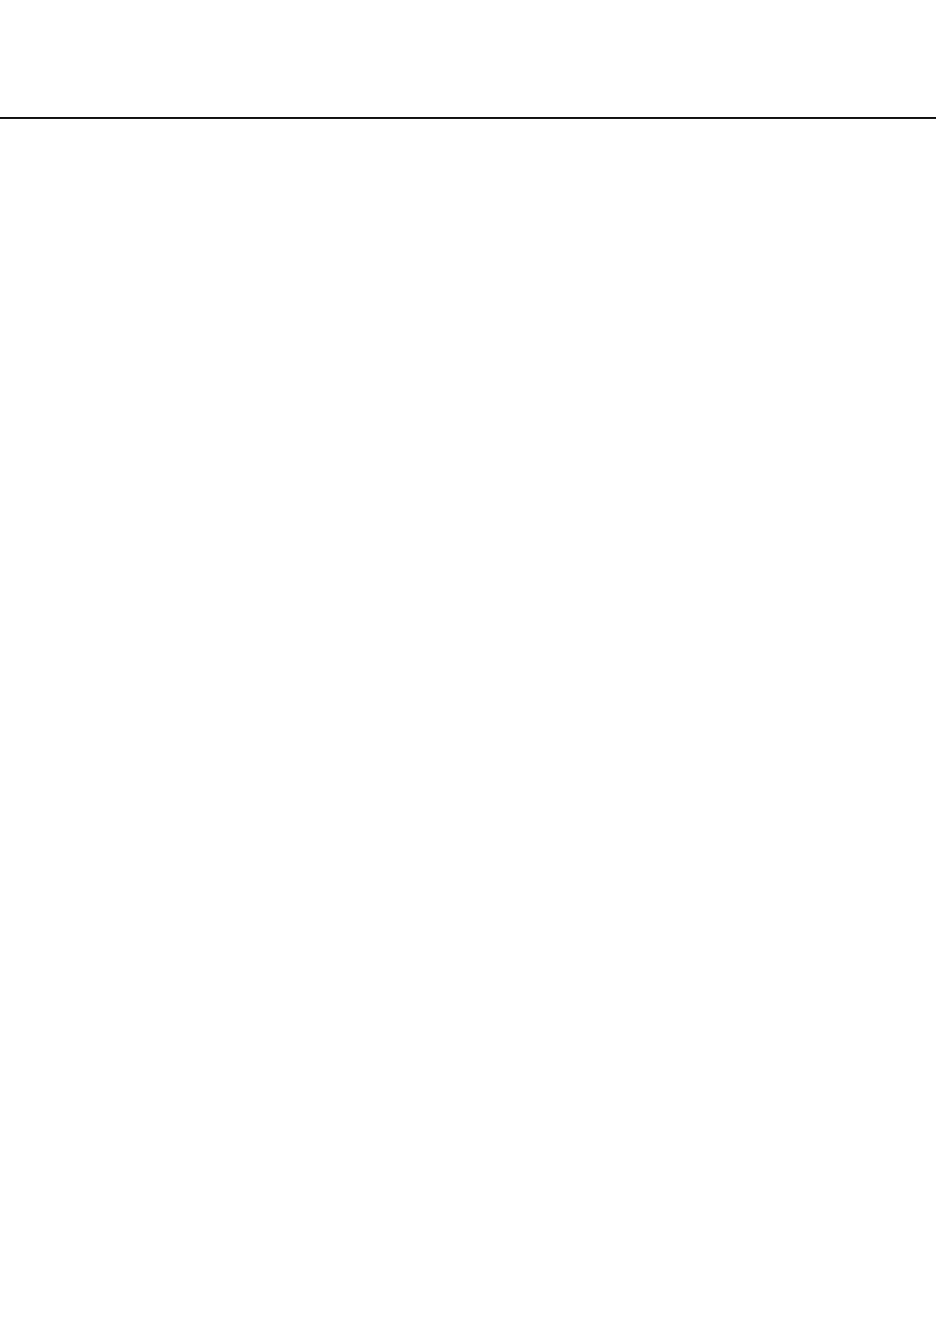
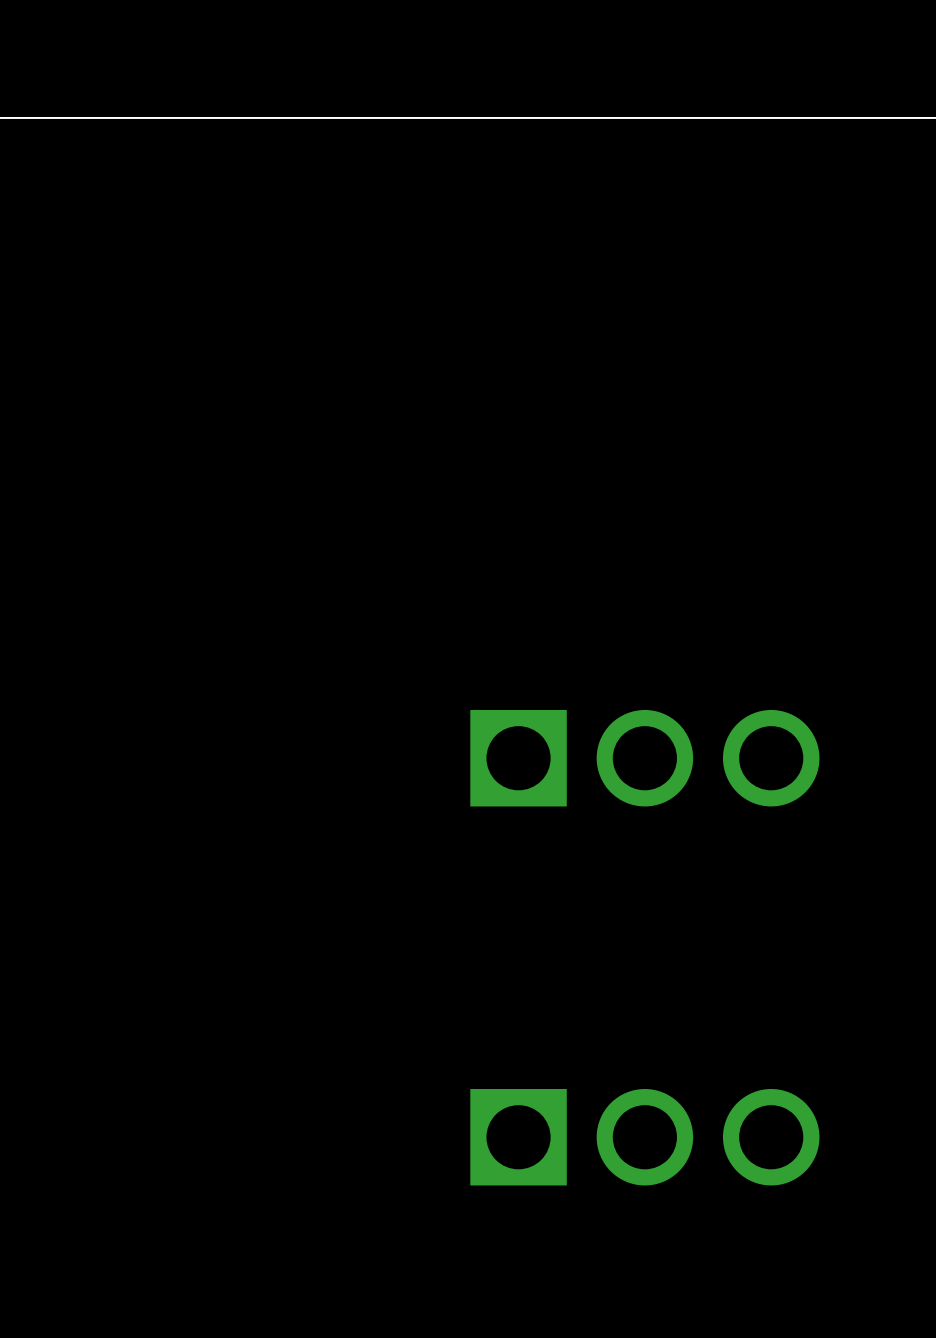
part: none -> (644, 758)
part: none -> (644, 1137)

